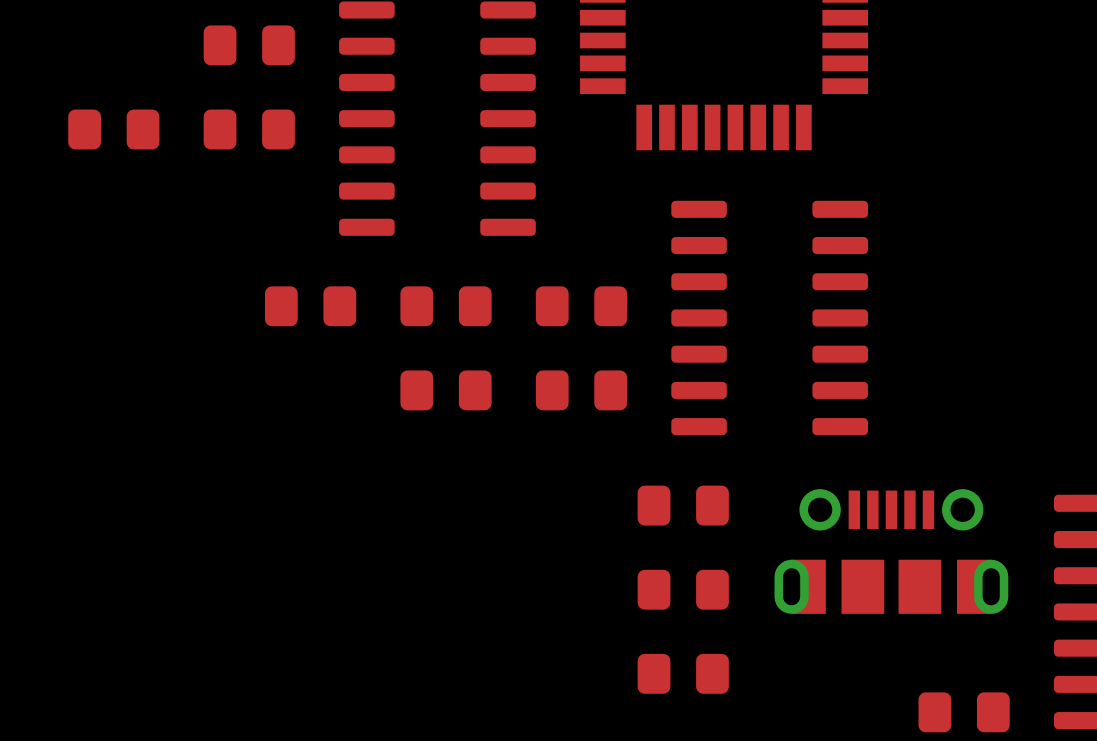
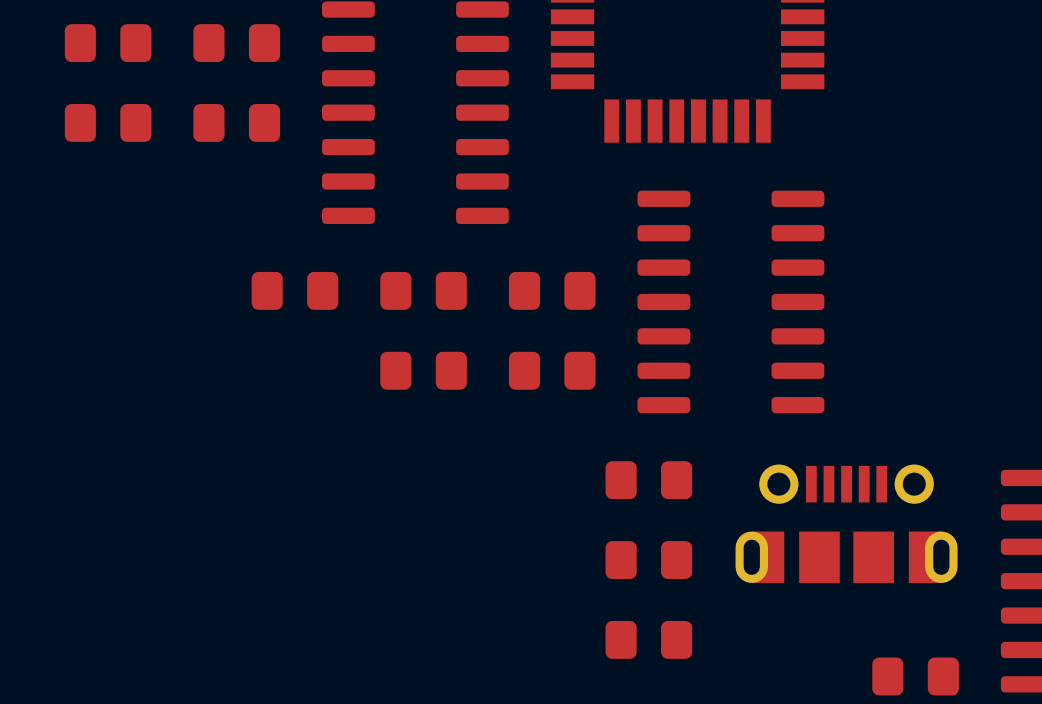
part: none -> (108, 43)

